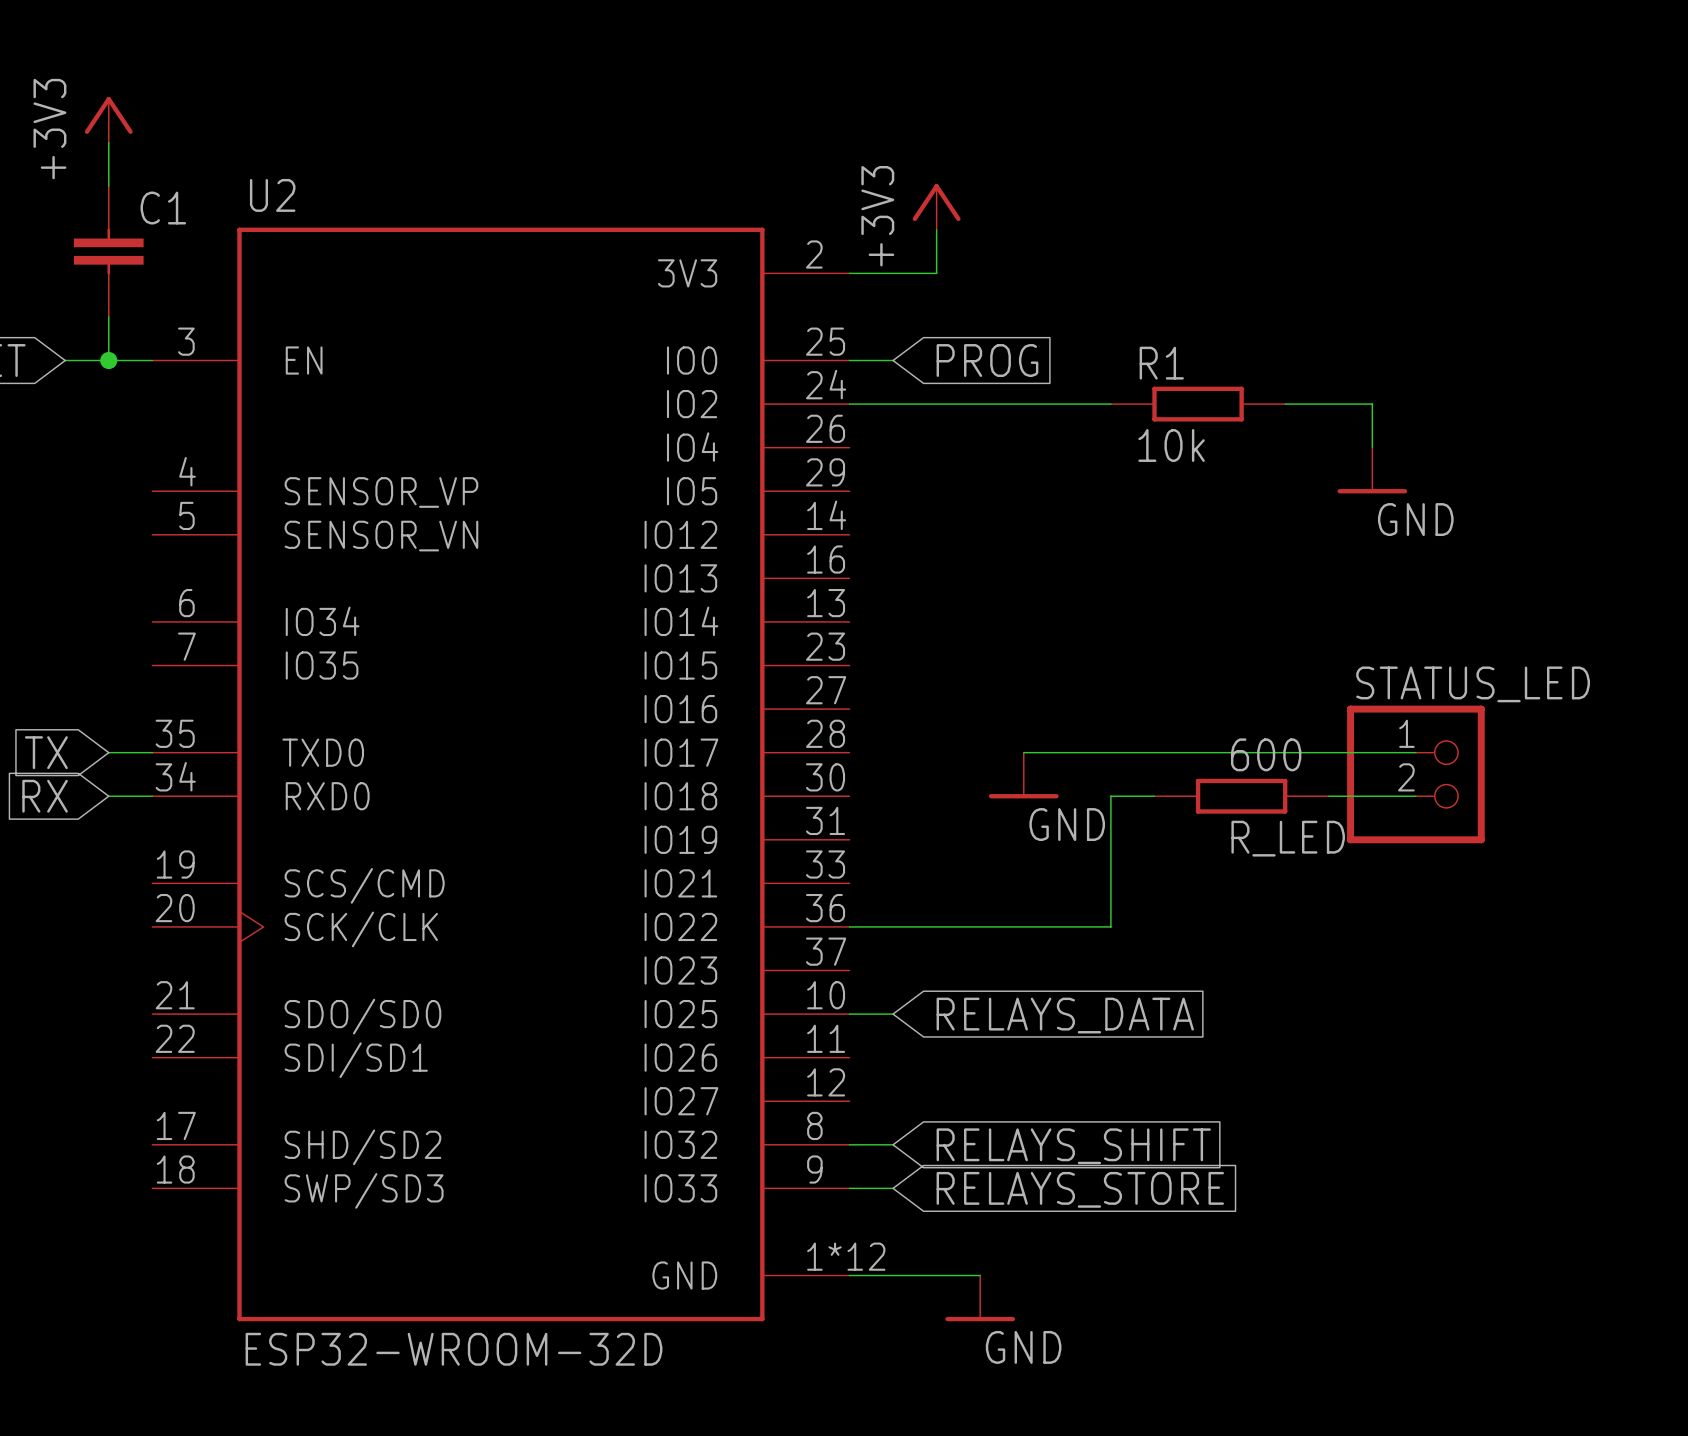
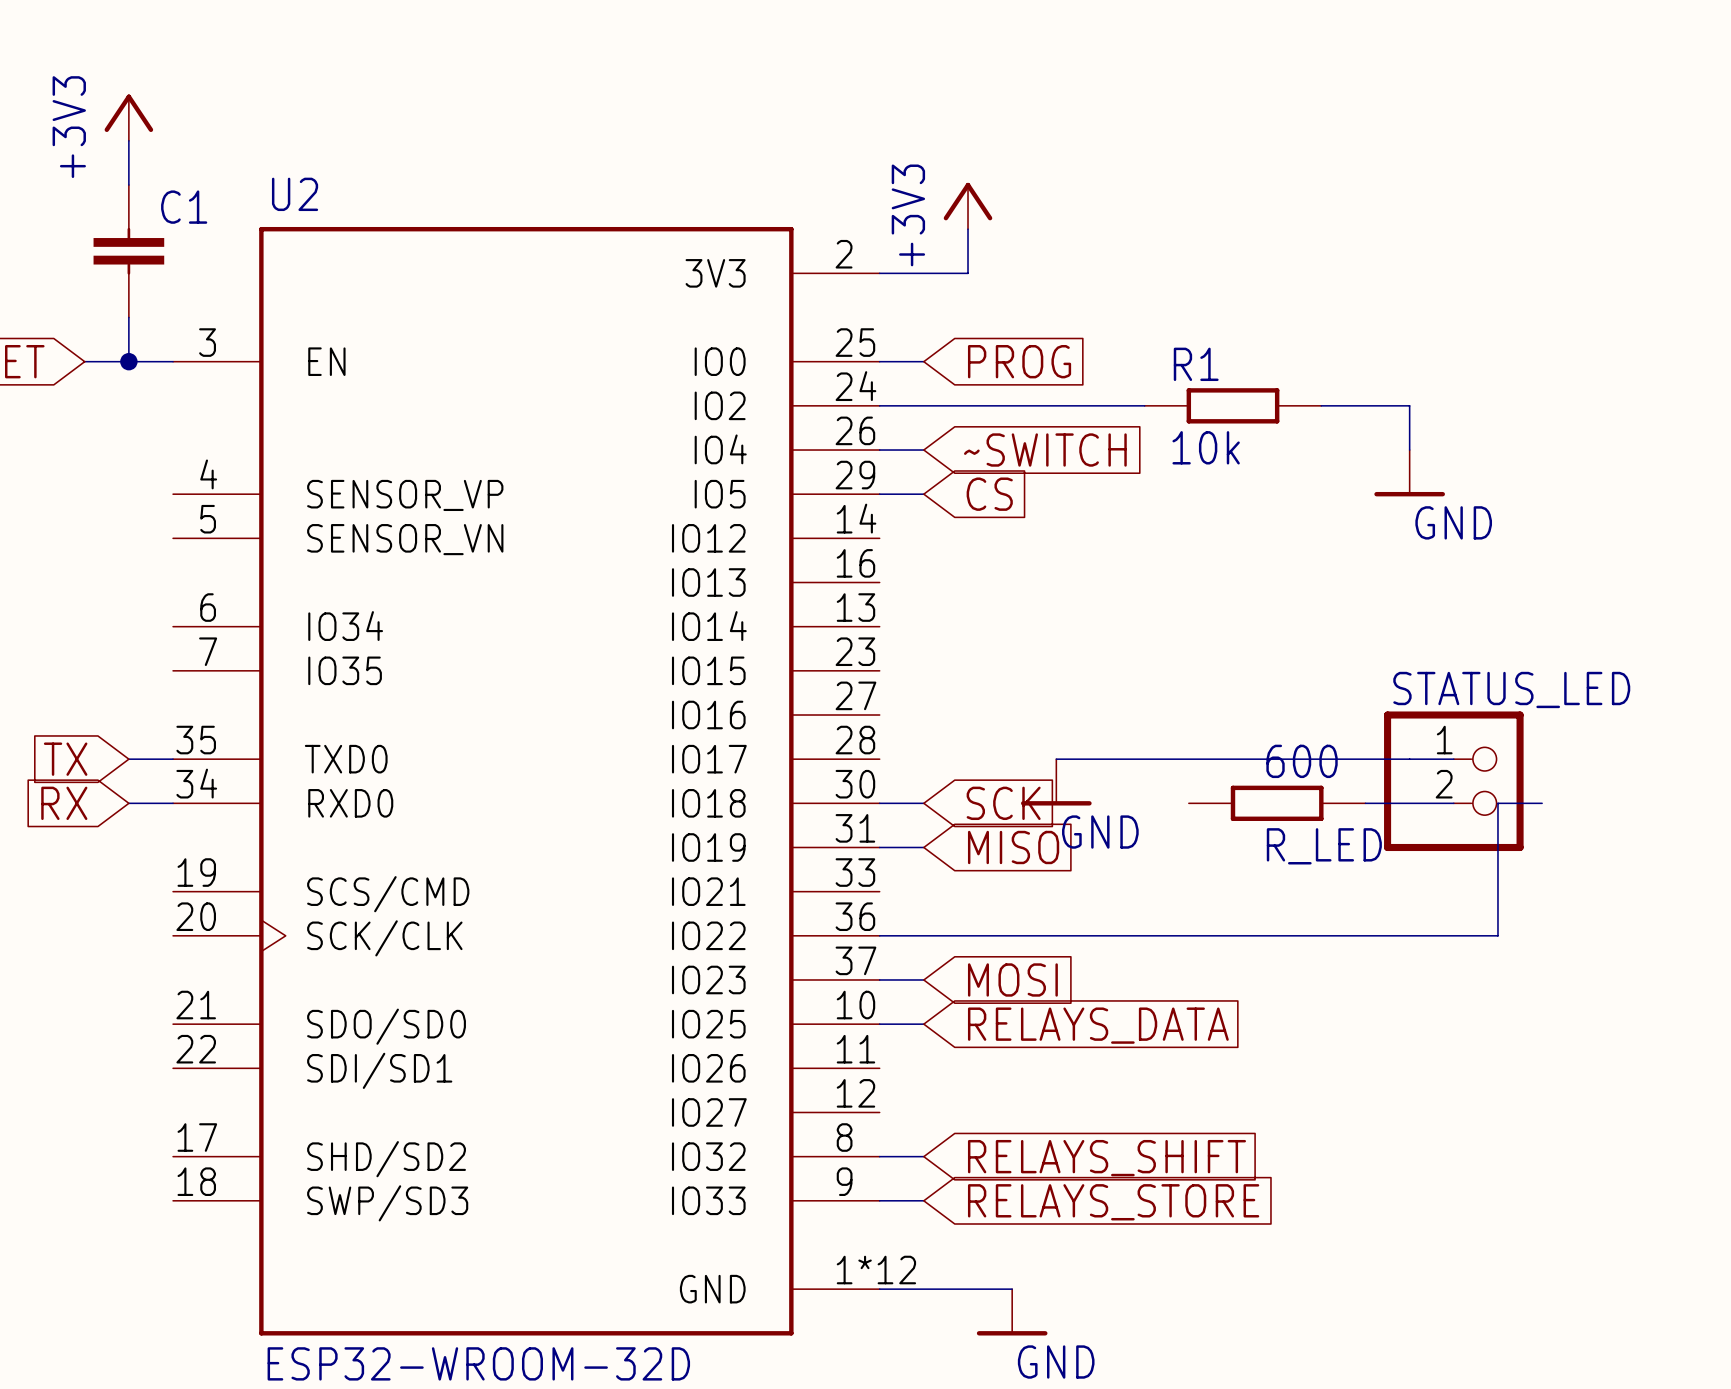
wire: none -> (879, 450) (923, 450)
global label: none -> ~SWITCH (1045, 450)
wire: none -> (879, 494) (923, 494)
global label: none -> CS (989, 494)
wire: none -> (879, 803) (923, 803)
global label: none -> SCK (1003, 803)
wire: (1154, 796) (1110, 796) (1110, 926) -> (1542, 803) (1497, 803) (1497, 935) (1144, 935)
wire: none -> (879, 847) (923, 847)
global label: none -> MISO (1013, 847)
wire: none -> (879, 979) (923, 979)
global label: none -> MOSI (1012, 979)

